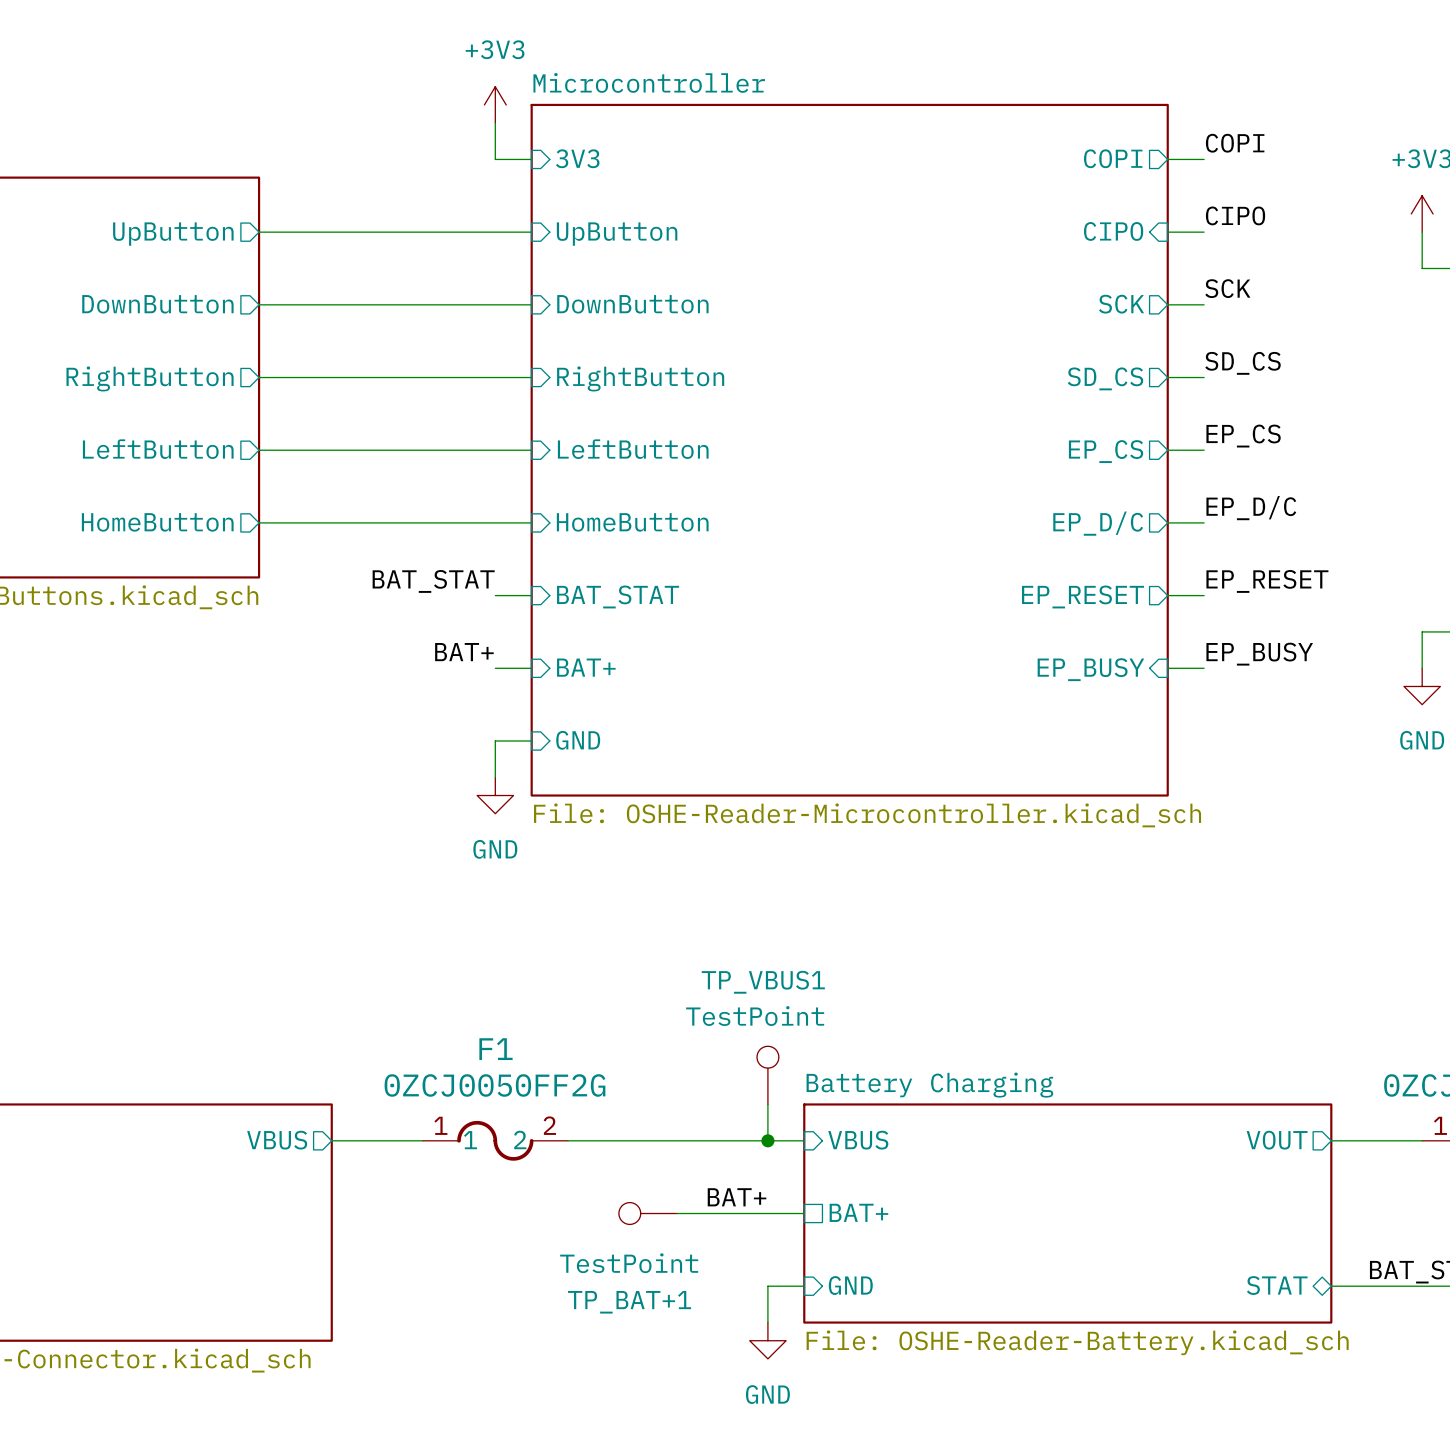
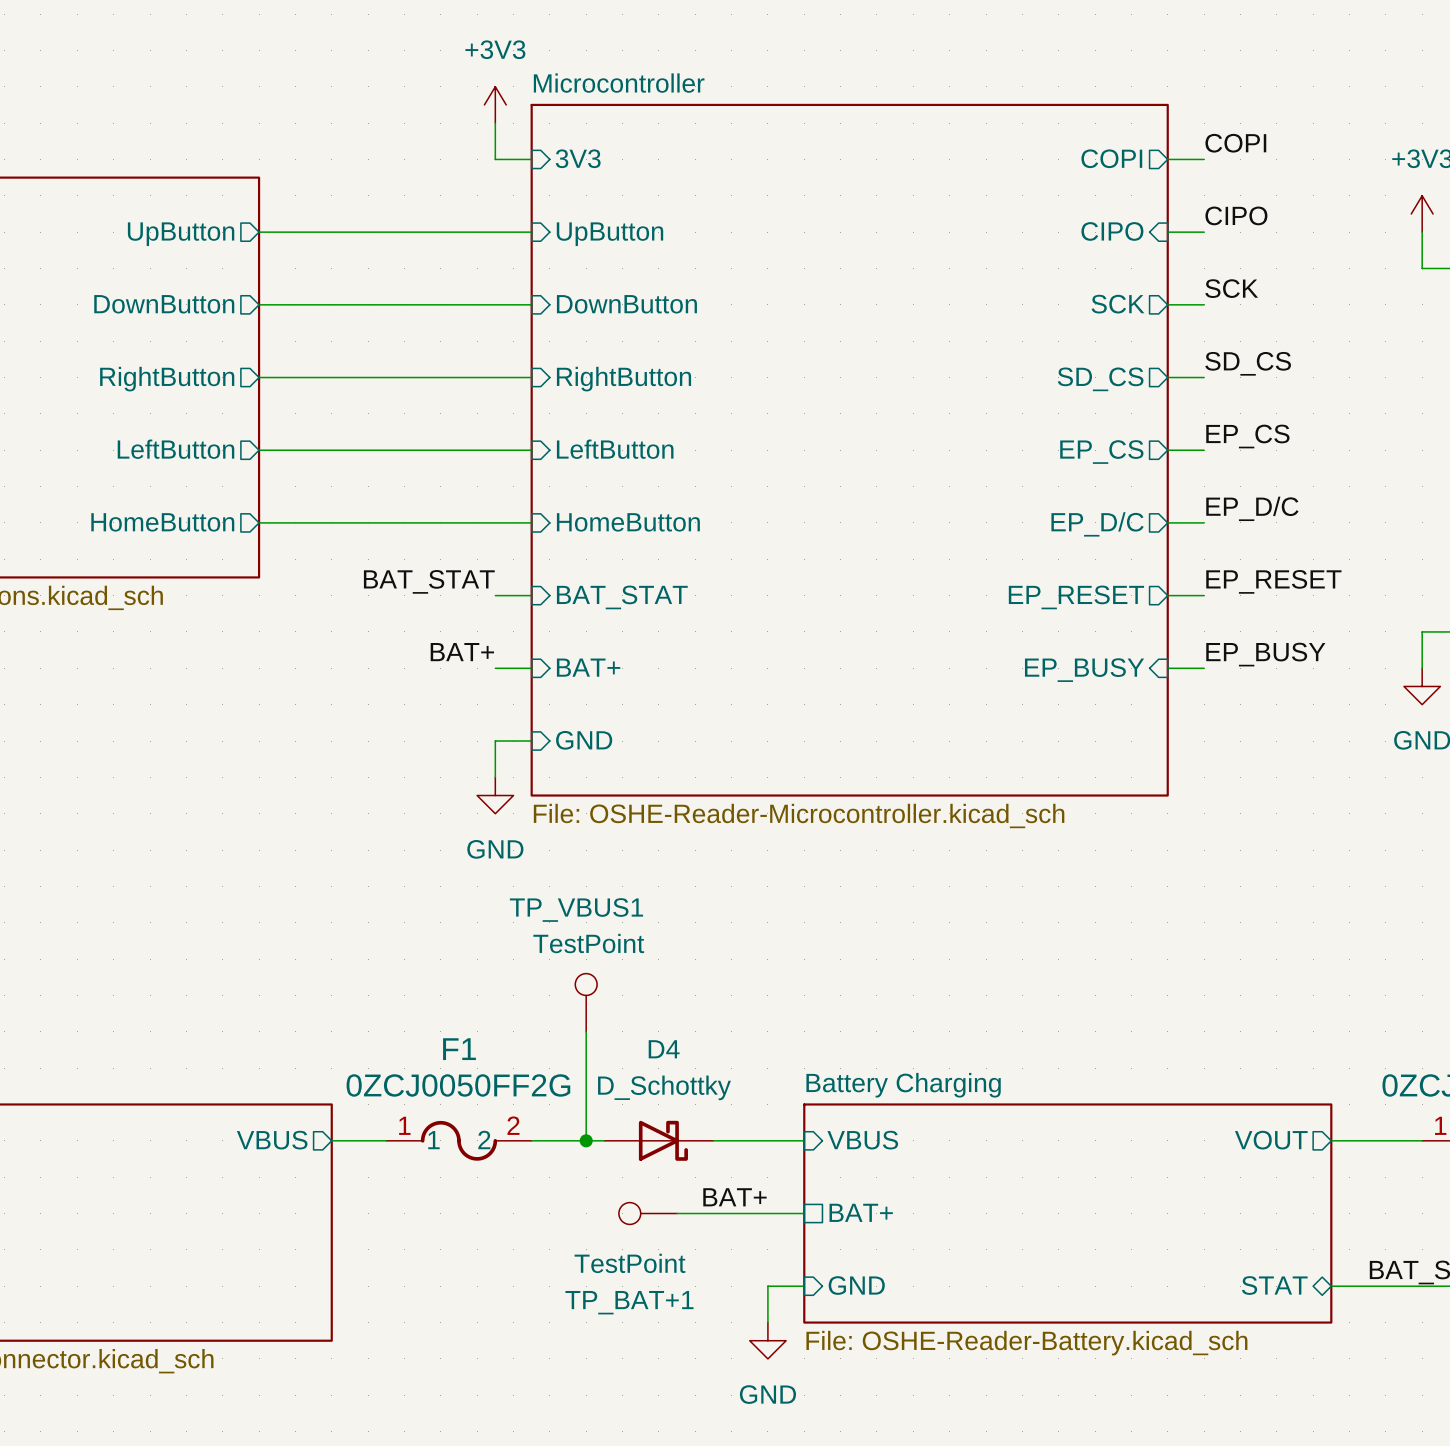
wire: none -> (586, 1031) (586, 1140)
TP_VBUS1 position: (767, 1075) -> (586, 1002)
wire: (767, 1104) (767, 1140) -> none
F1 position: (495, 1140) -> (458, 1140)
junction: none -> (586, 1140)
D4: none -> D_Schottky (658, 1140)
junction: (767, 1140) -> none

